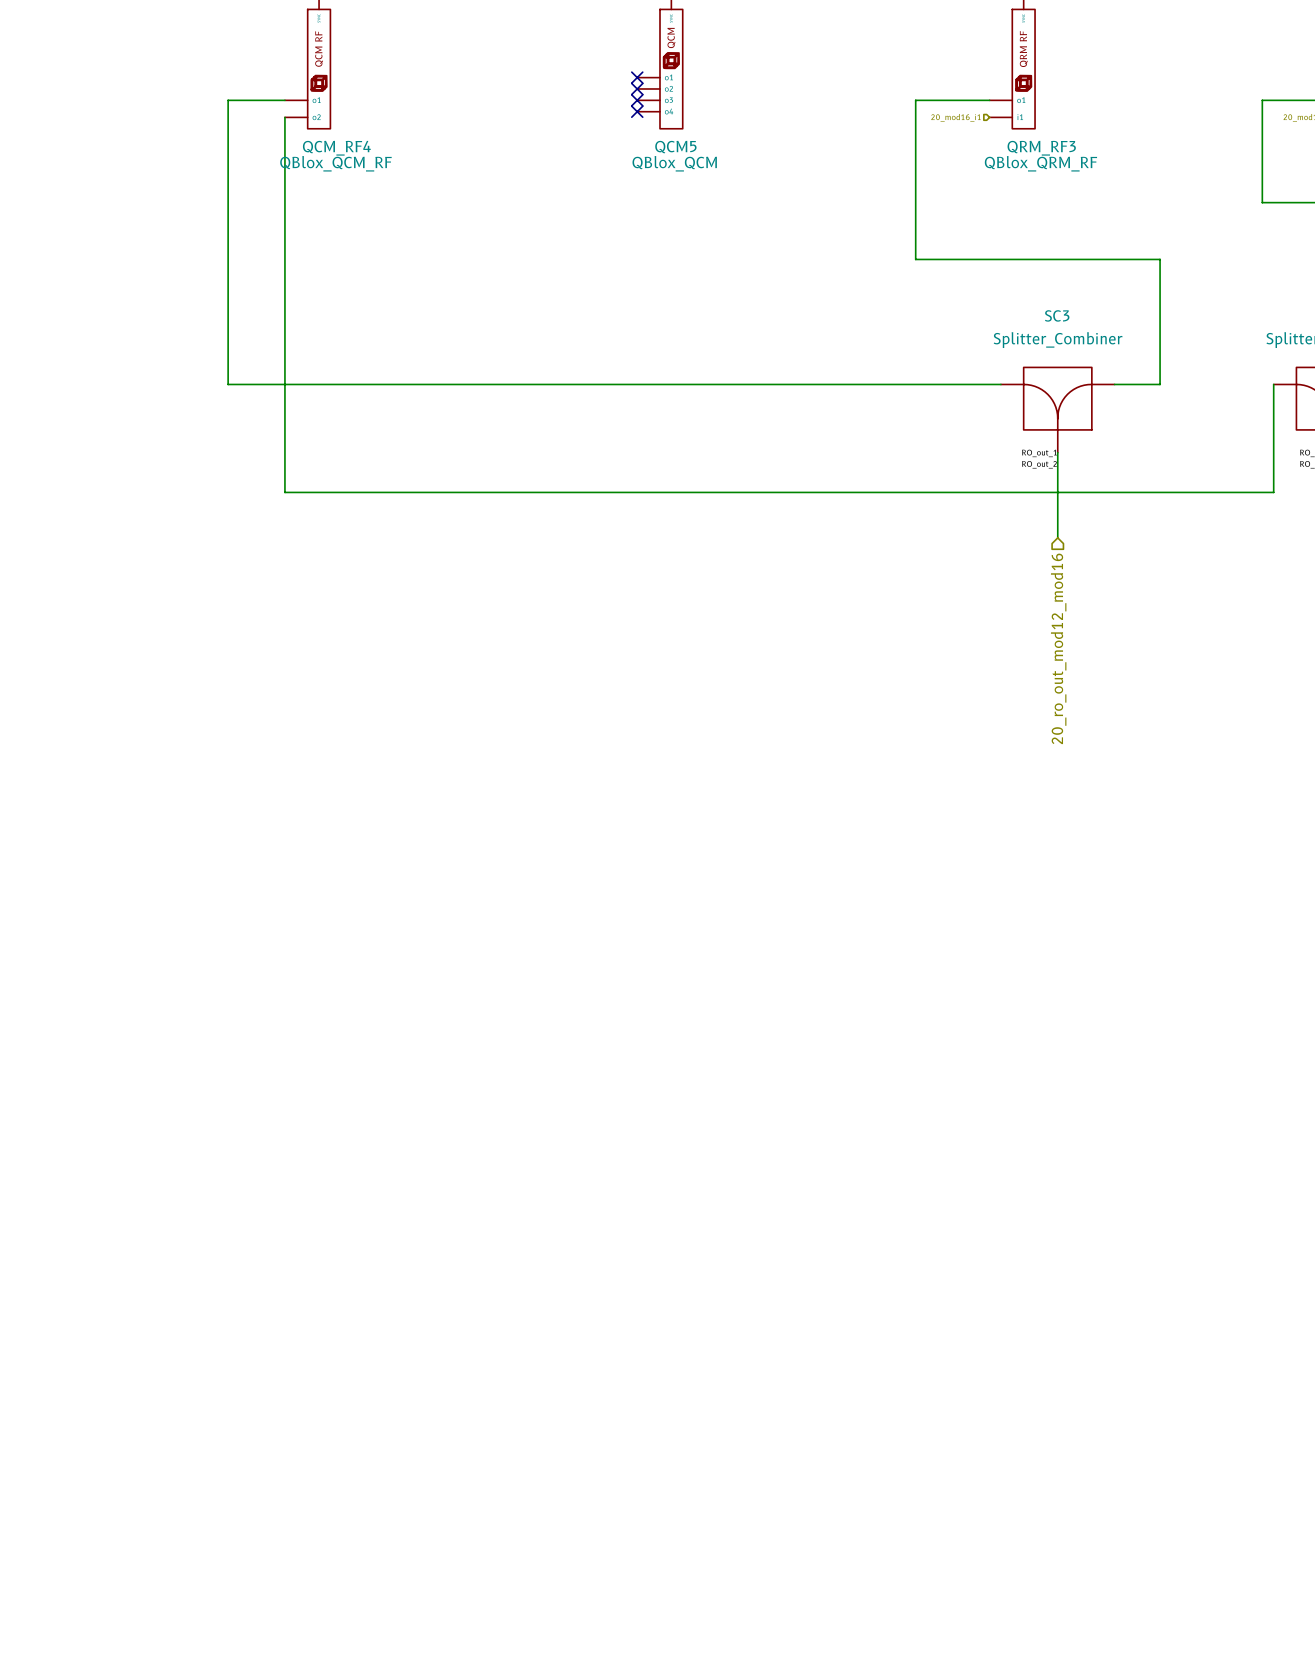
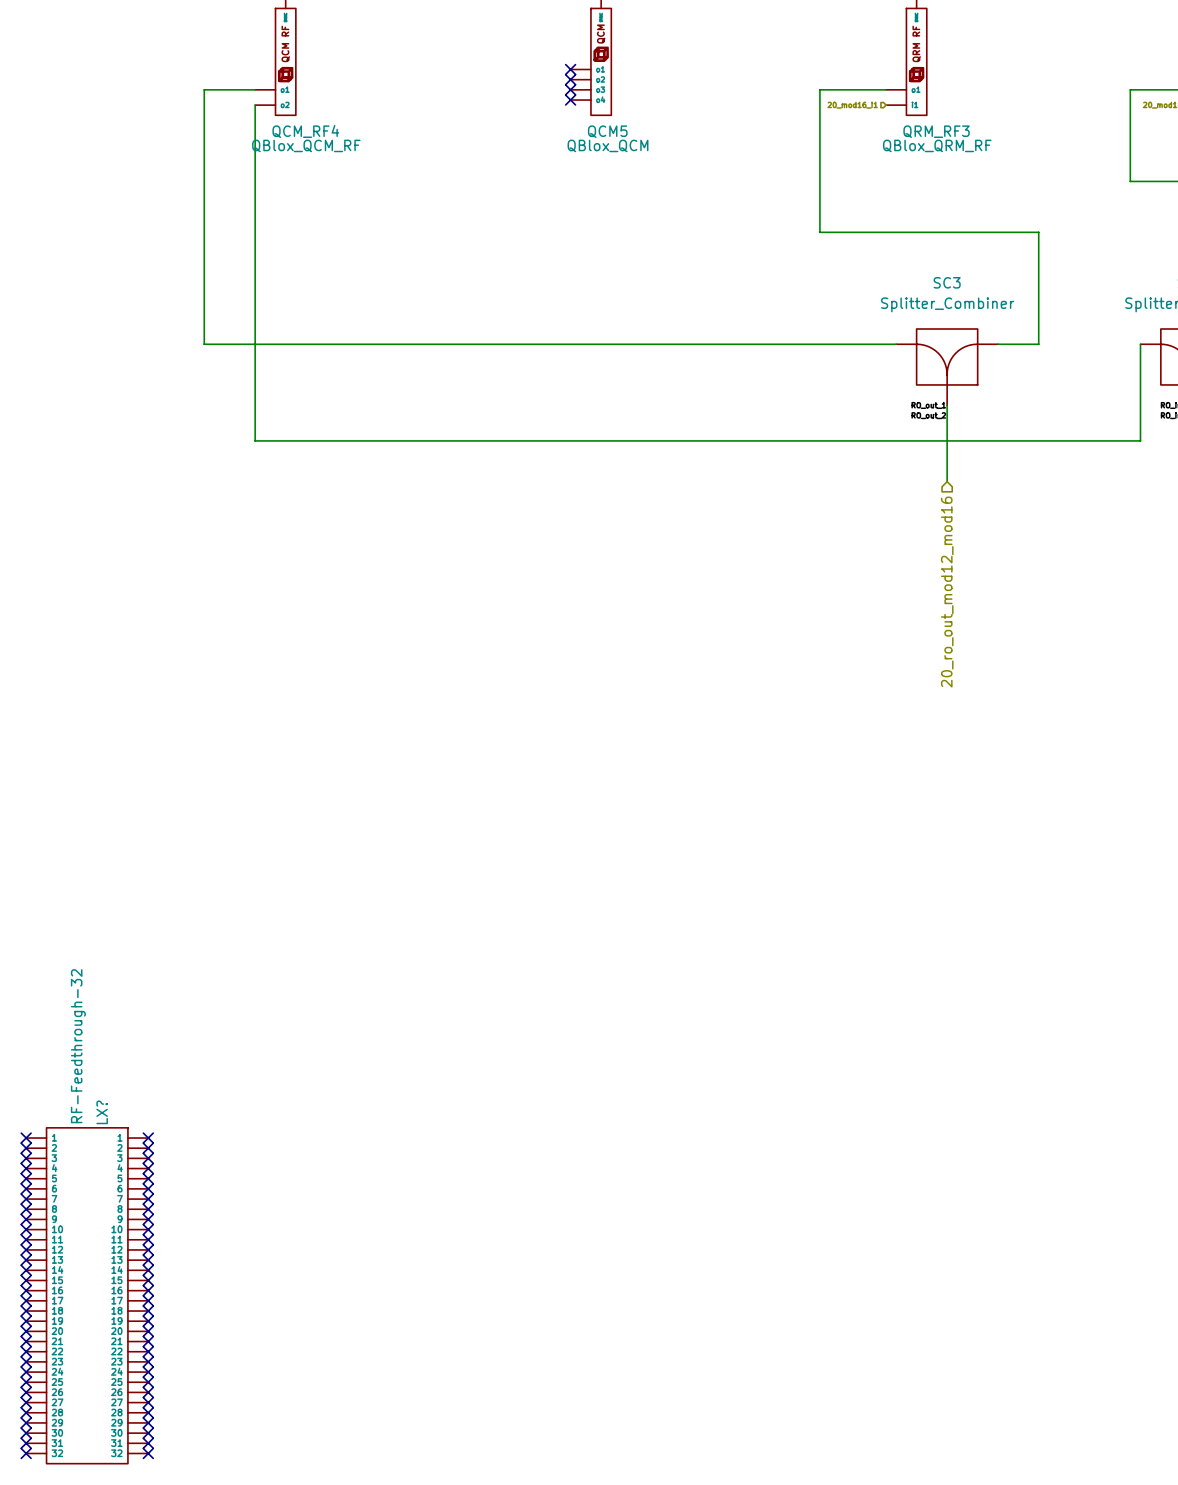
no-connect mark: none -> (26, 1138)
no-connect mark: none -> (148, 1138)
no-connect mark: none -> (26, 1148)
no-connect mark: none -> (148, 1148)
no-connect mark: none -> (26, 1158)
no-connect mark: none -> (148, 1158)
no-connect mark: none -> (26, 1168)
no-connect mark: none -> (148, 1168)
no-connect mark: none -> (26, 1178)
no-connect mark: none -> (148, 1178)
no-connect mark: none -> (26, 1188)
no-connect mark: none -> (148, 1188)
no-connect mark: none -> (26, 1199)
no-connect mark: none -> (148, 1199)
no-connect mark: none -> (26, 1209)
no-connect mark: none -> (148, 1209)
no-connect mark: none -> (26, 1219)
no-connect mark: none -> (148, 1219)
no-connect mark: none -> (26, 1229)
no-connect mark: none -> (148, 1229)
no-connect mark: none -> (26, 1239)
no-connect mark: none -> (148, 1239)
no-connect mark: none -> (26, 1249)
no-connect mark: none -> (148, 1249)
no-connect mark: none -> (26, 1260)
no-connect mark: none -> (148, 1260)
no-connect mark: none -> (26, 1270)
no-connect mark: none -> (148, 1270)
no-connect mark: none -> (26, 1280)
no-connect mark: none -> (148, 1280)
no-connect mark: none -> (26, 1290)
no-connect mark: none -> (148, 1290)
LX?: none -> RF-Feedthrough-32 (87, 1295)
no-connect mark: none -> (26, 1300)
no-connect mark: none -> (148, 1300)
no-connect mark: none -> (26, 1311)
no-connect mark: none -> (148, 1311)
no-connect mark: none -> (26, 1321)
no-connect mark: none -> (148, 1321)
no-connect mark: none -> (26, 1331)
no-connect mark: none -> (148, 1331)
no-connect mark: none -> (26, 1341)
no-connect mark: none -> (148, 1341)
no-connect mark: none -> (26, 1351)
no-connect mark: none -> (148, 1351)
no-connect mark: none -> (26, 1361)
no-connect mark: none -> (148, 1361)
no-connect mark: none -> (26, 1372)
no-connect mark: none -> (148, 1372)
no-connect mark: none -> (26, 1382)
no-connect mark: none -> (148, 1382)
no-connect mark: none -> (26, 1392)
no-connect mark: none -> (148, 1392)
no-connect mark: none -> (26, 1402)
no-connect mark: none -> (148, 1402)
no-connect mark: none -> (26, 1412)
no-connect mark: none -> (148, 1412)
no-connect mark: none -> (26, 1422)
no-connect mark: none -> (148, 1422)
no-connect mark: none -> (26, 1433)
no-connect mark: none -> (148, 1433)
no-connect mark: none -> (26, 1443)
no-connect mark: none -> (148, 1443)
no-connect mark: none -> (26, 1453)
no-connect mark: none -> (148, 1453)

